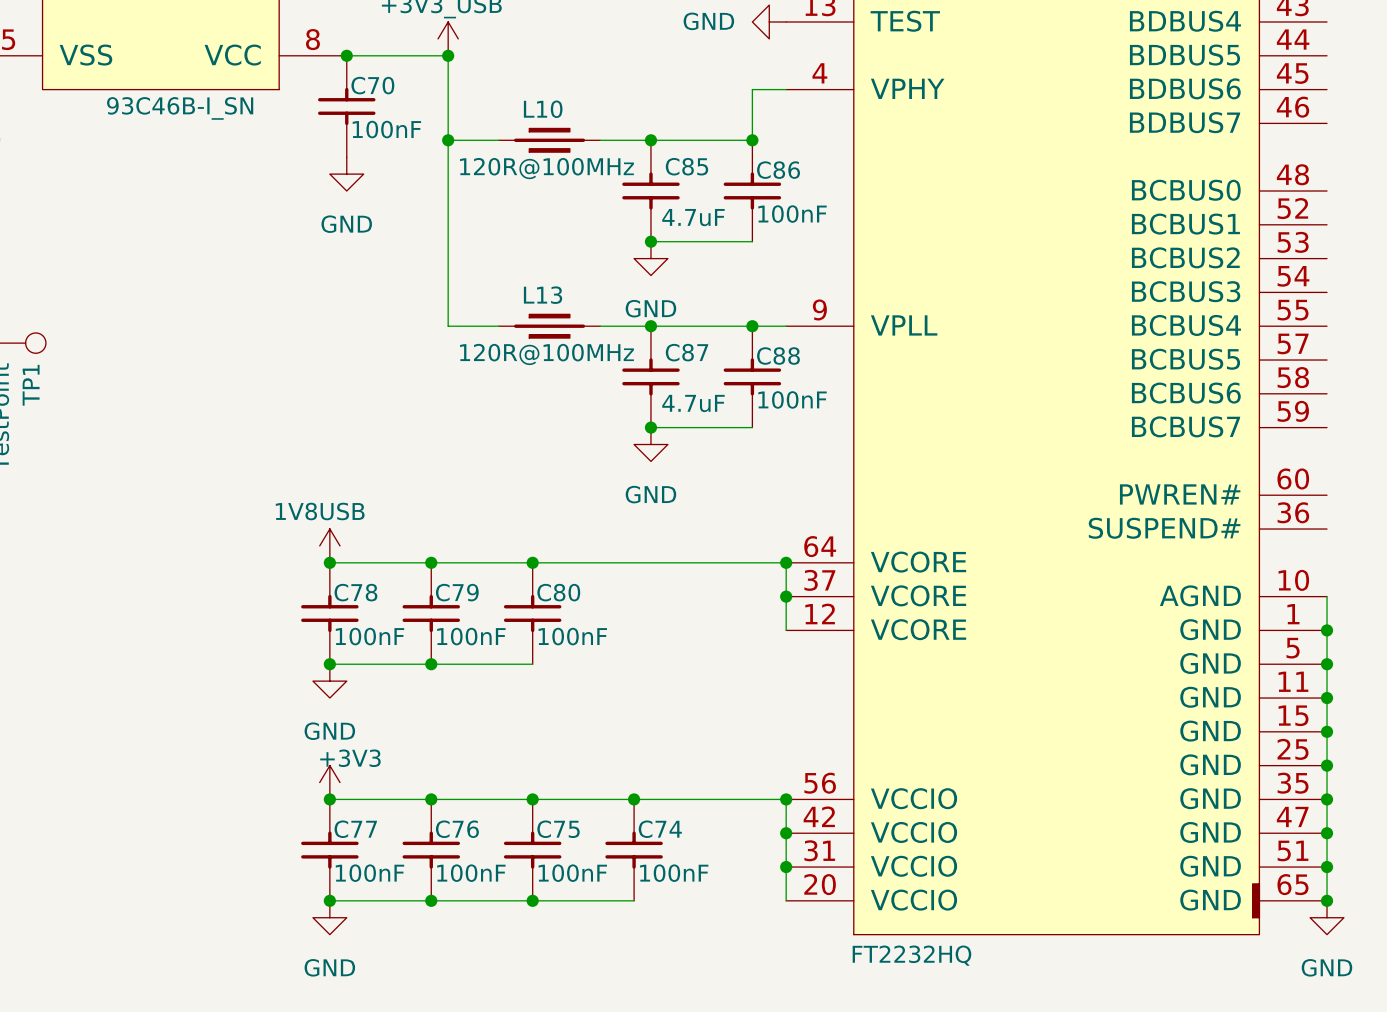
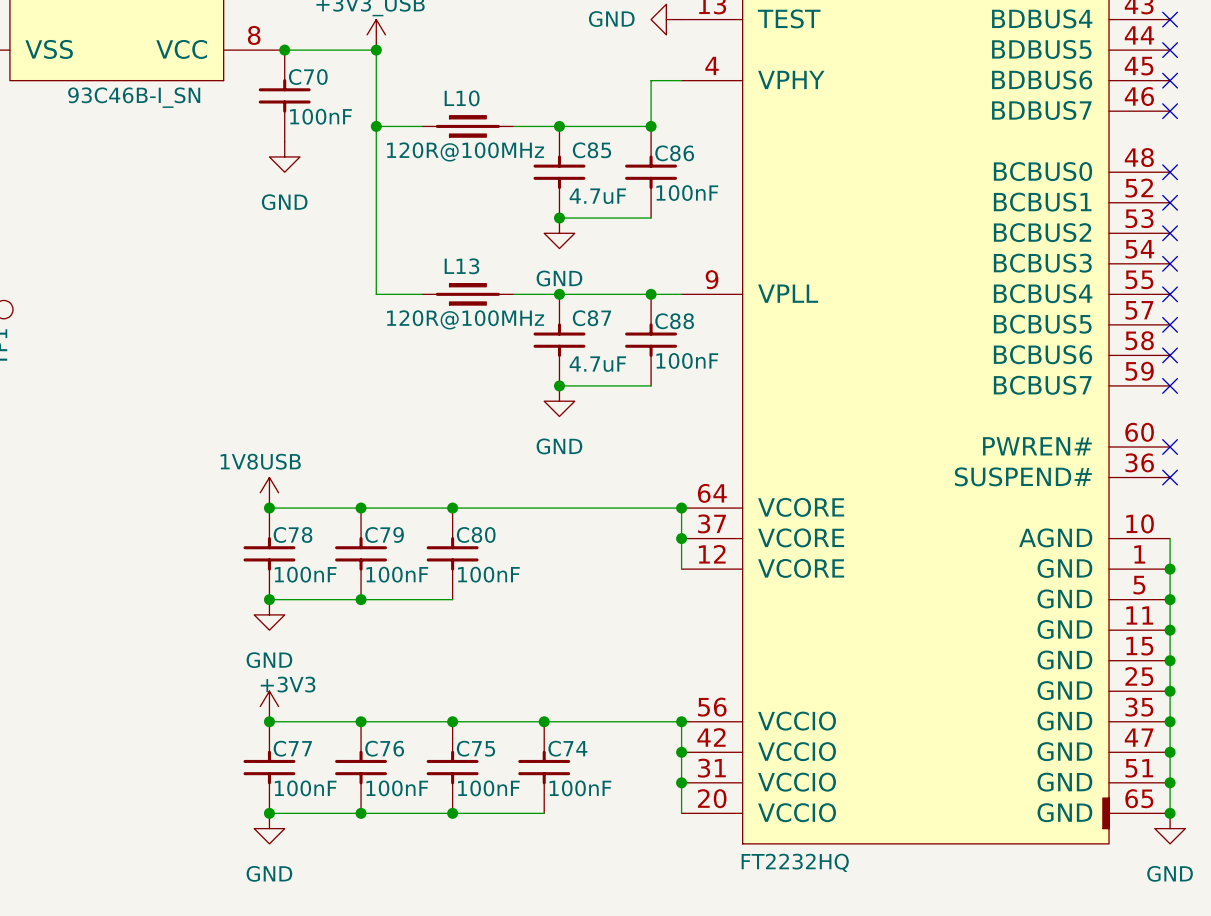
no-connect mark: none -> (1170, 19)
no-connect mark: none -> (1170, 50)
no-connect mark: none -> (1170, 80)
no-connect mark: none -> (1170, 111)
no-connect mark: none -> (1170, 172)
no-connect mark: none -> (1170, 202)
no-connect mark: none -> (1170, 233)
no-connect mark: none -> (1170, 263)
no-connect mark: none -> (1170, 294)
no-connect mark: none -> (1170, 324)
no-connect mark: none -> (1170, 355)
no-connect mark: none -> (1170, 385)
no-connect mark: none -> (1170, 447)
no-connect mark: none -> (1170, 477)

